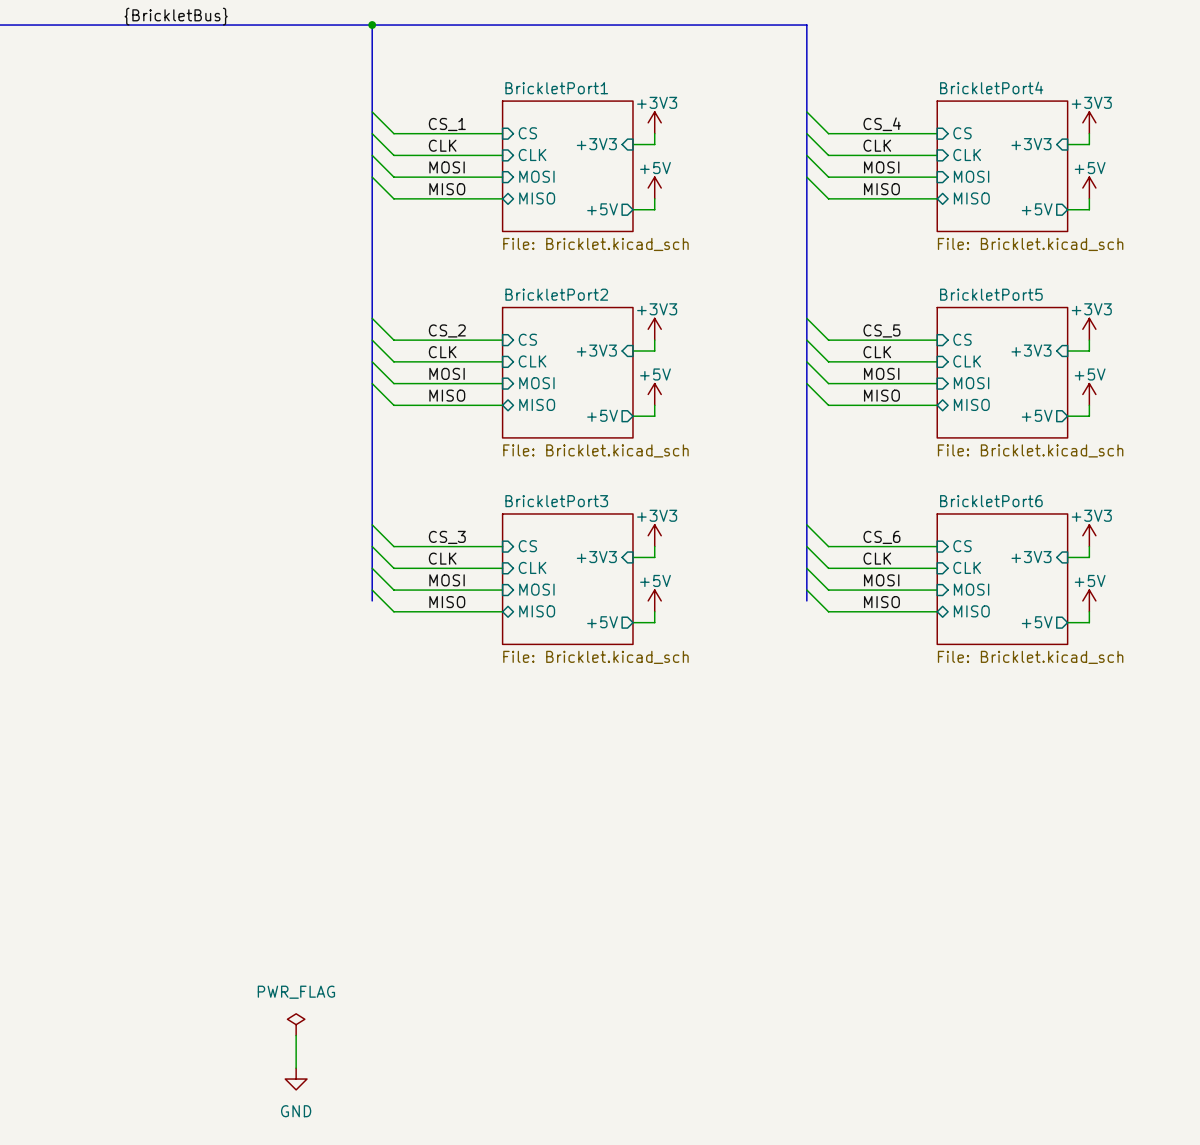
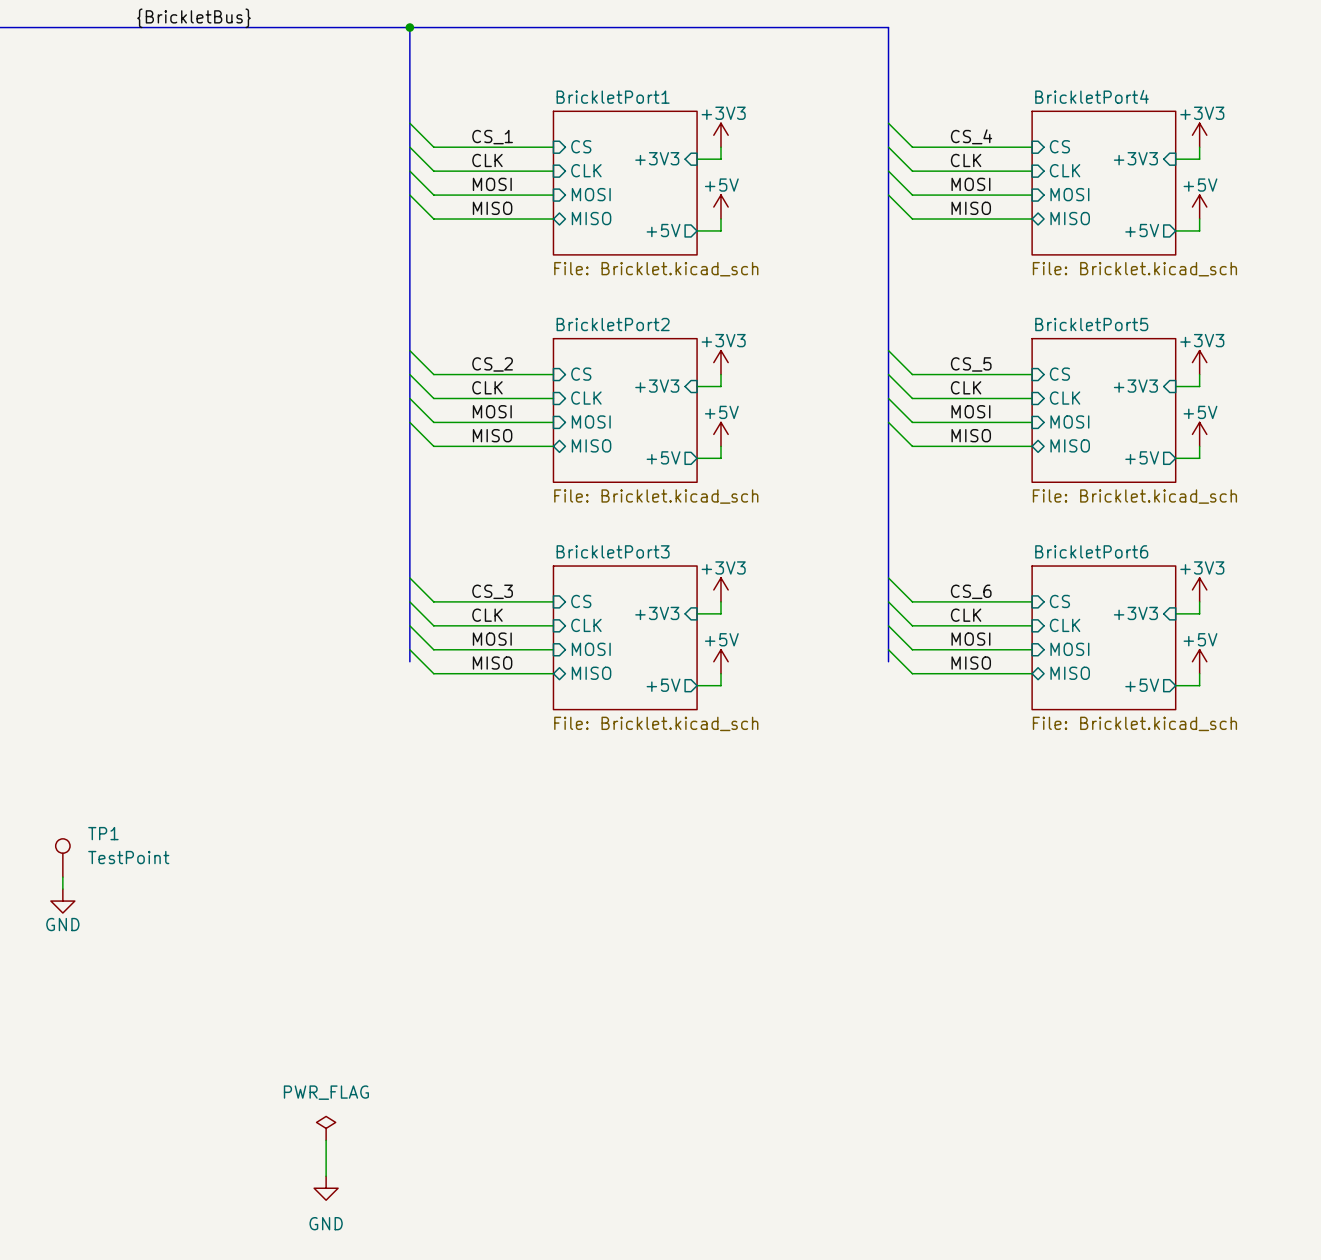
TP1: none -> TestPoint (62, 857)
wire: none -> (62, 877) (62, 889)
power symbol: none -> GND (62, 901)

